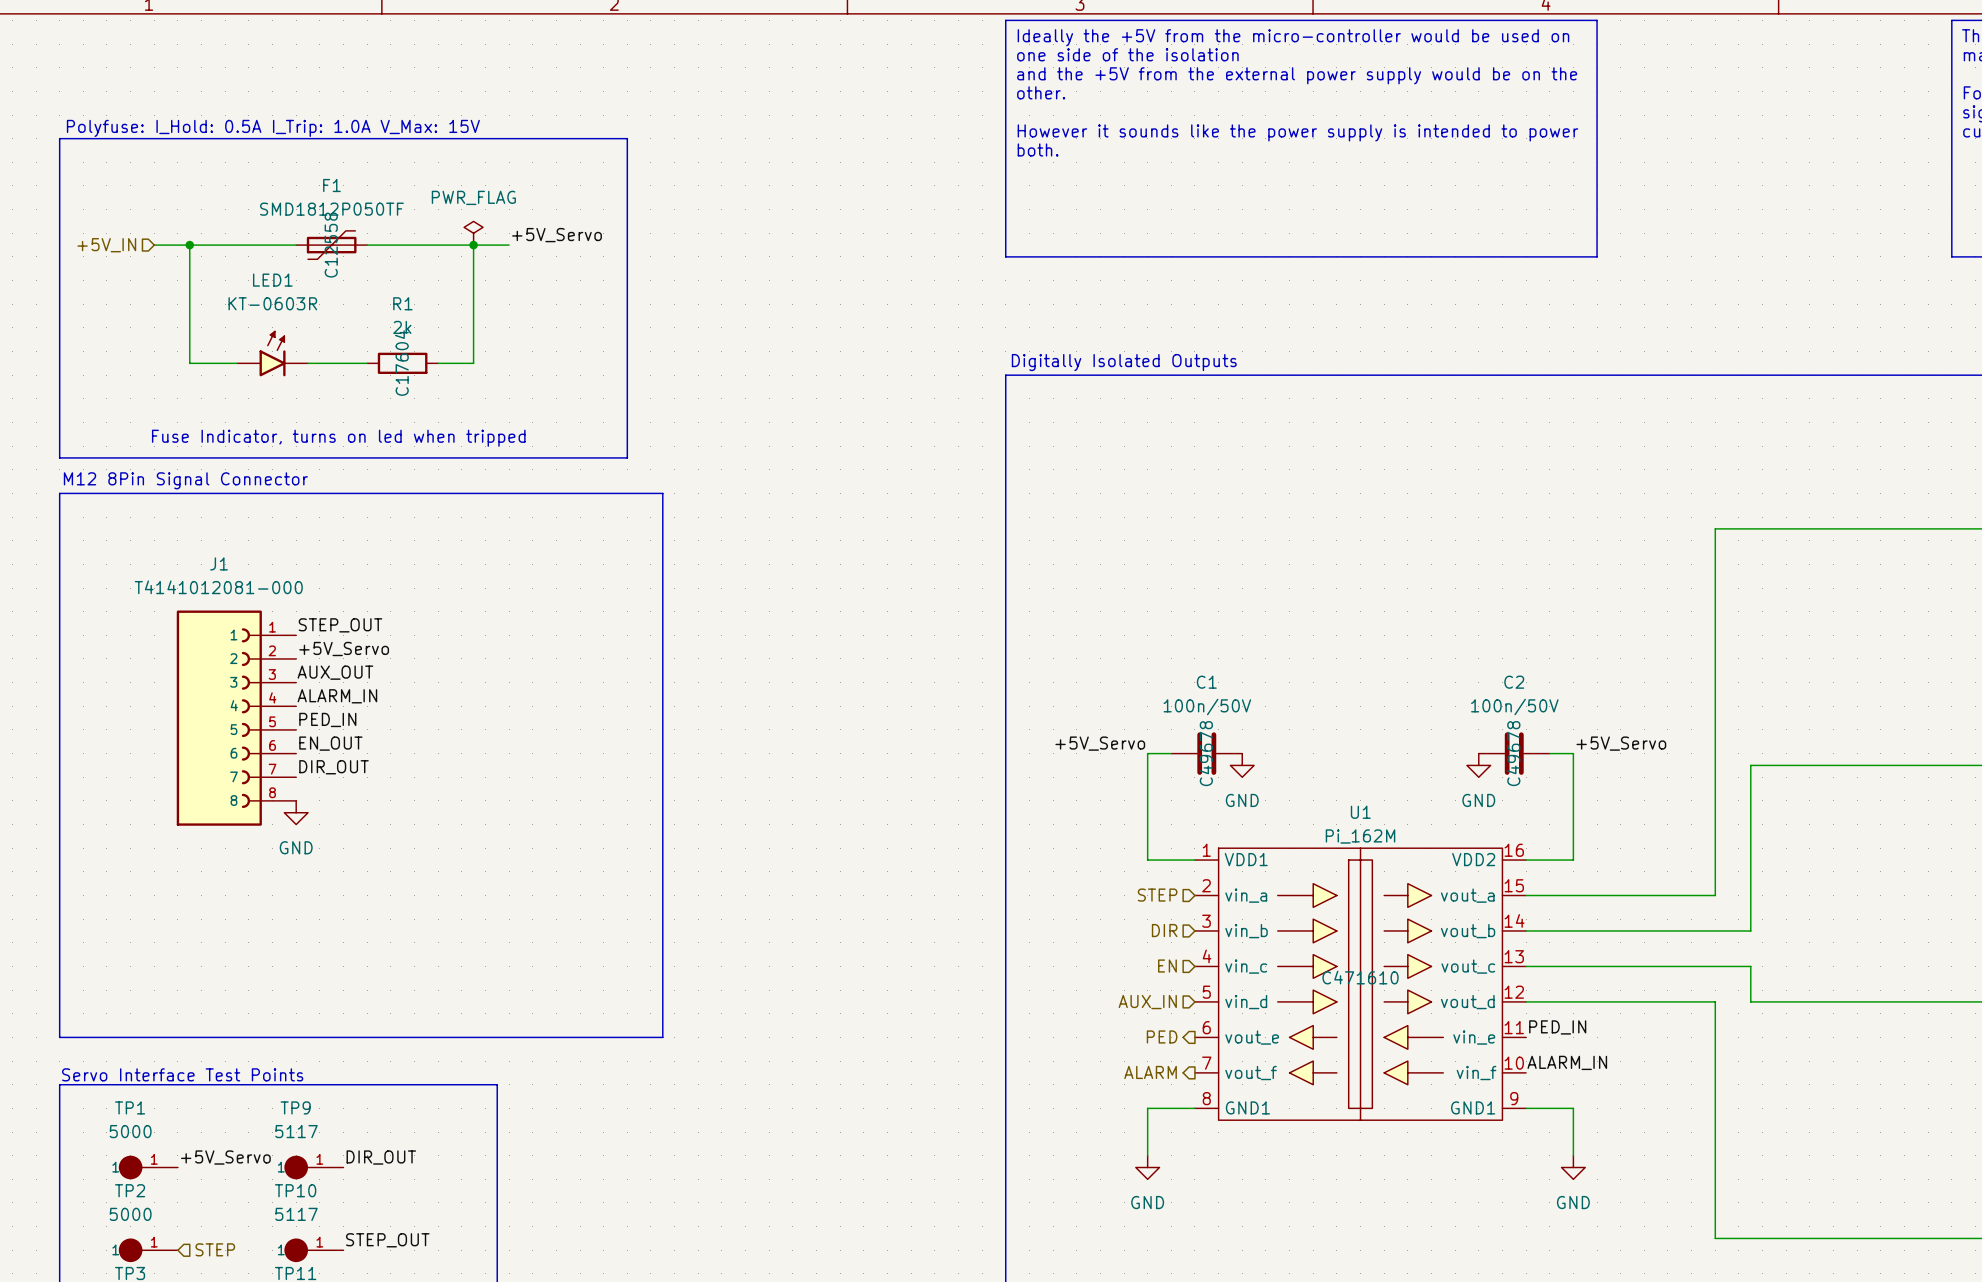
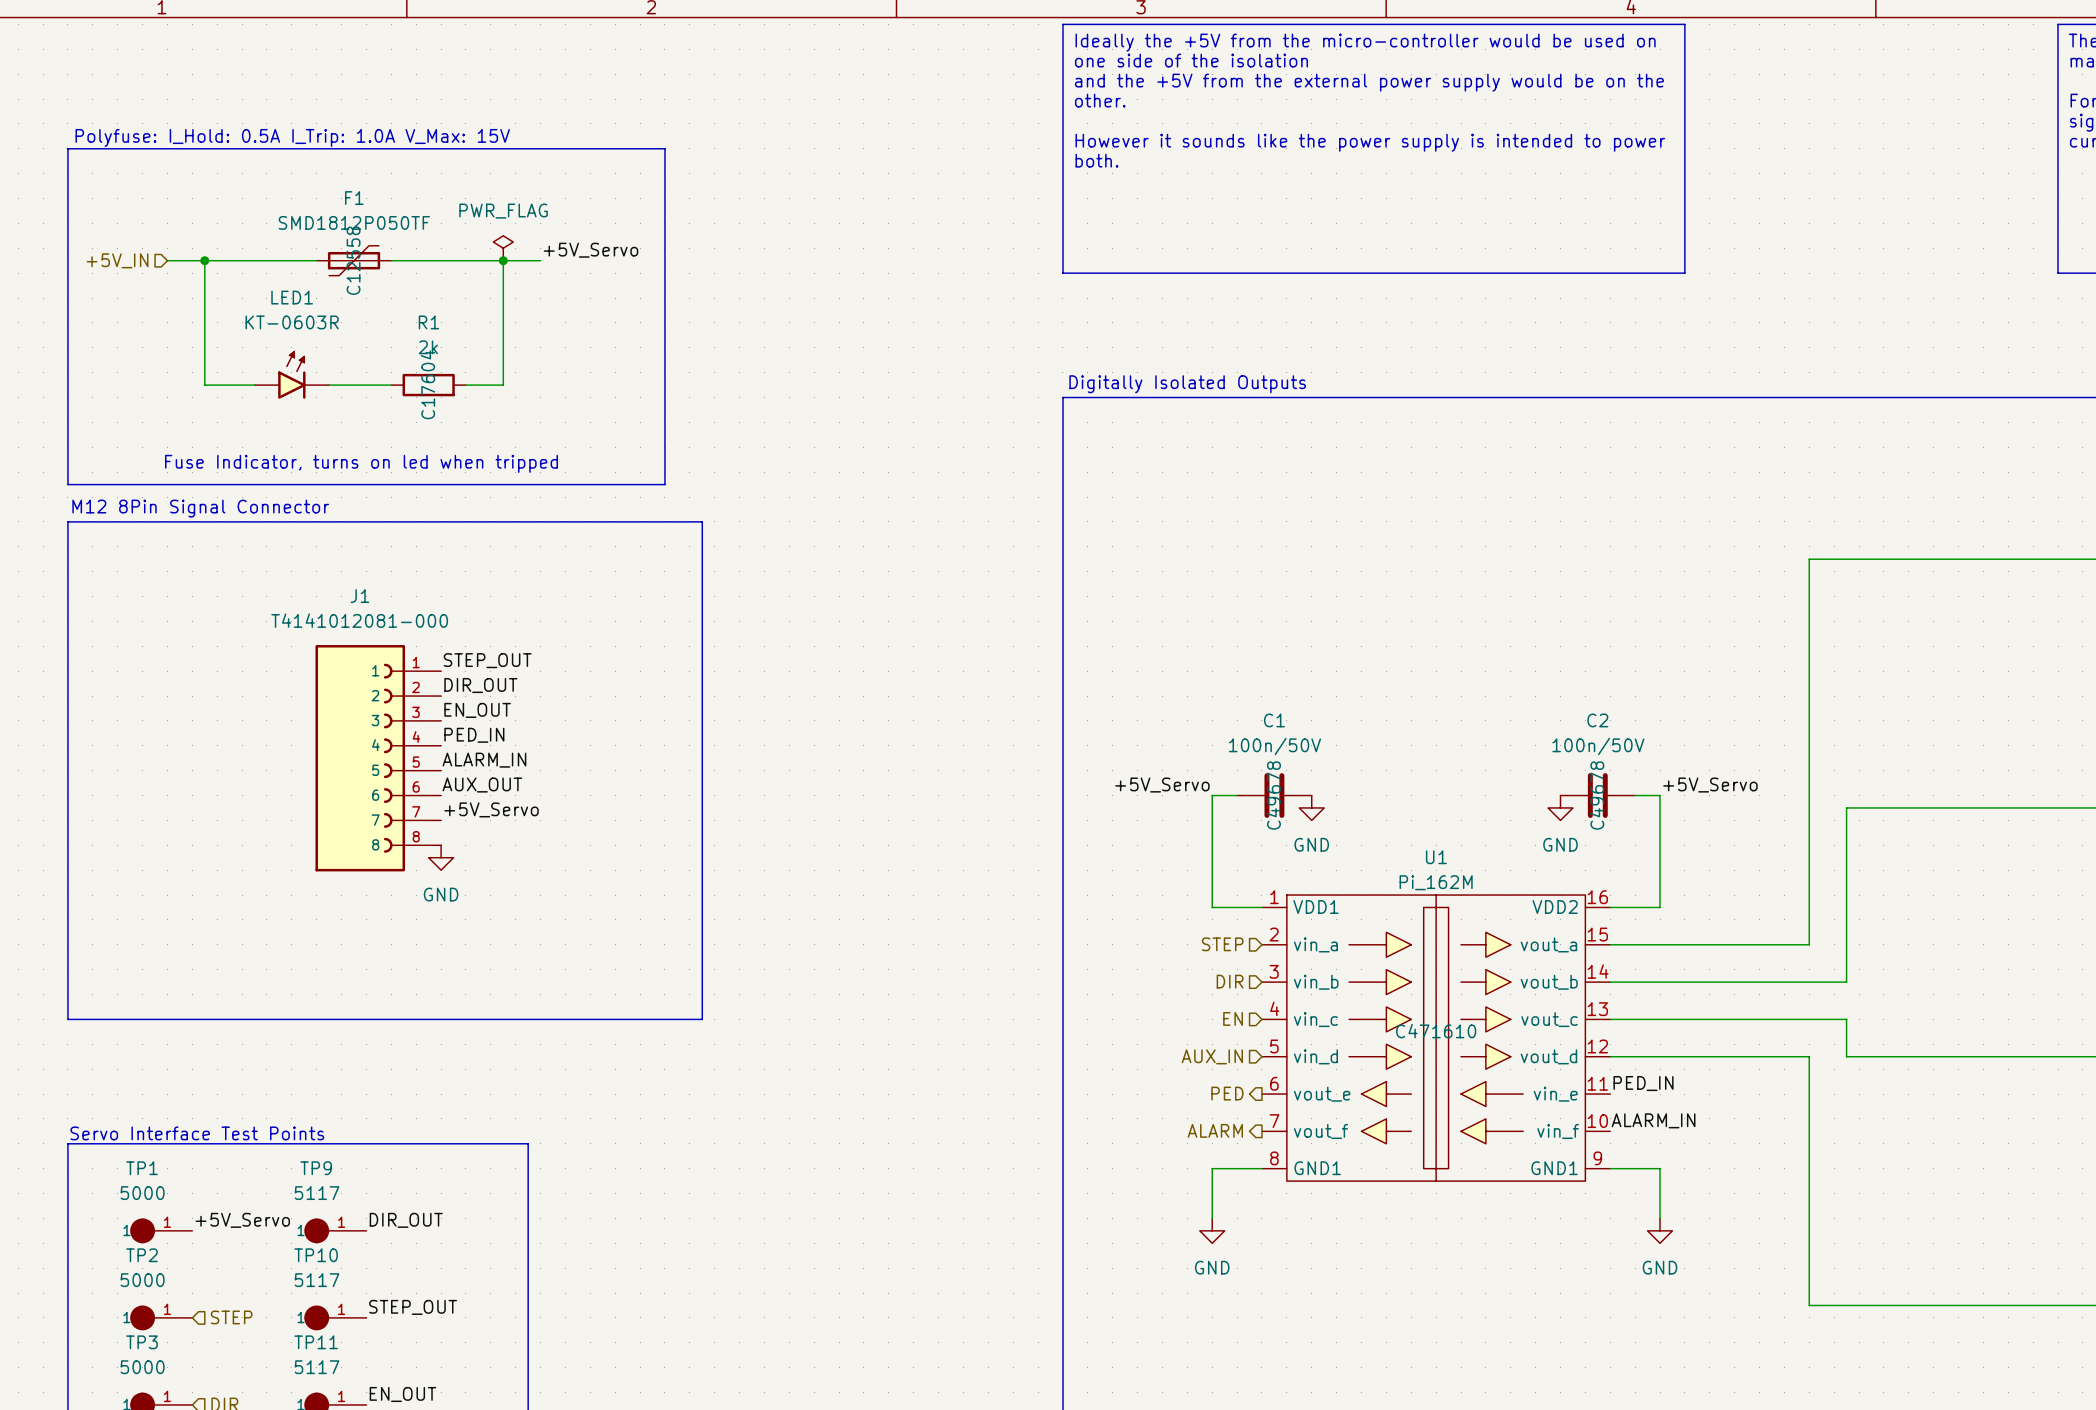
label position: STEP_OUT (340, 625) -> STEP_OUT (487, 660)
label position: +5V_Servo (344, 649) -> +5V_Servo (491, 809)
label position: AUX_OUT (335, 672) -> AUX_OUT (482, 785)
label position: ALARM_IN (337, 696) -> ALARM_IN (484, 760)
J1 position: (236, 718) -> (378, 758)
label position: PED_IN (327, 719) -> PED_IN (474, 735)
label position: EN_OUT (330, 743) -> EN_OUT (477, 710)
label position: DIR_OUT (334, 767) -> DIR_OUT (480, 685)
power symbol position: GND (296, 812) -> GND (441, 857)
line: (59, 966) (59, 1037) (662, 1037) (662, 966) -> (67, 1019) (702, 1019)

